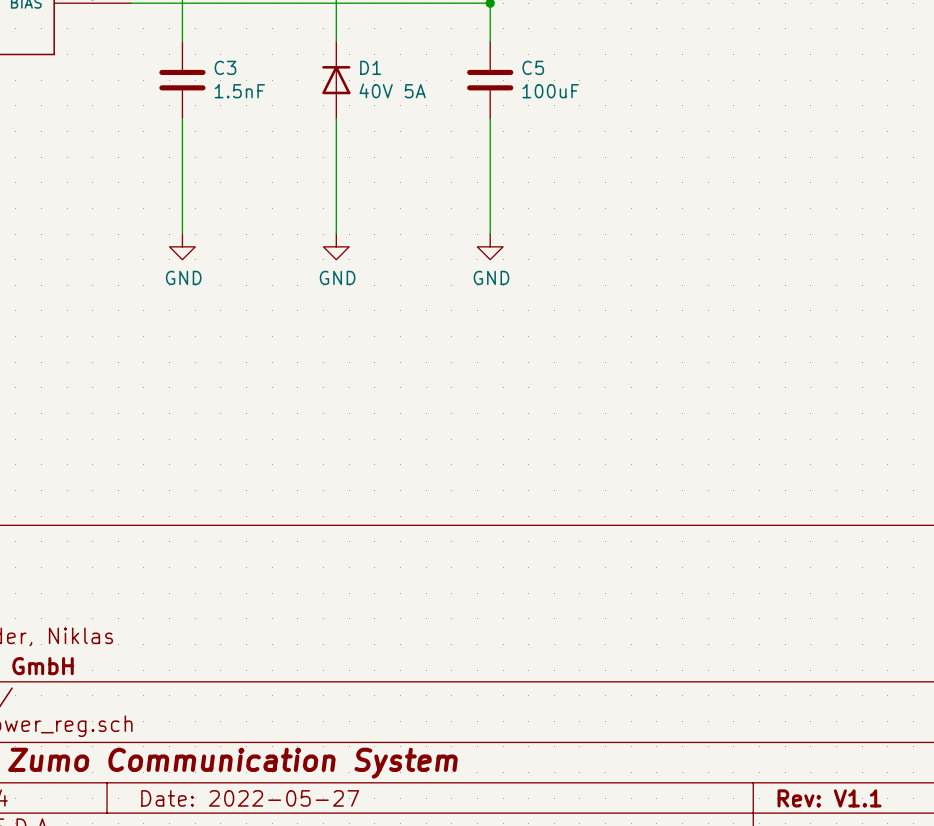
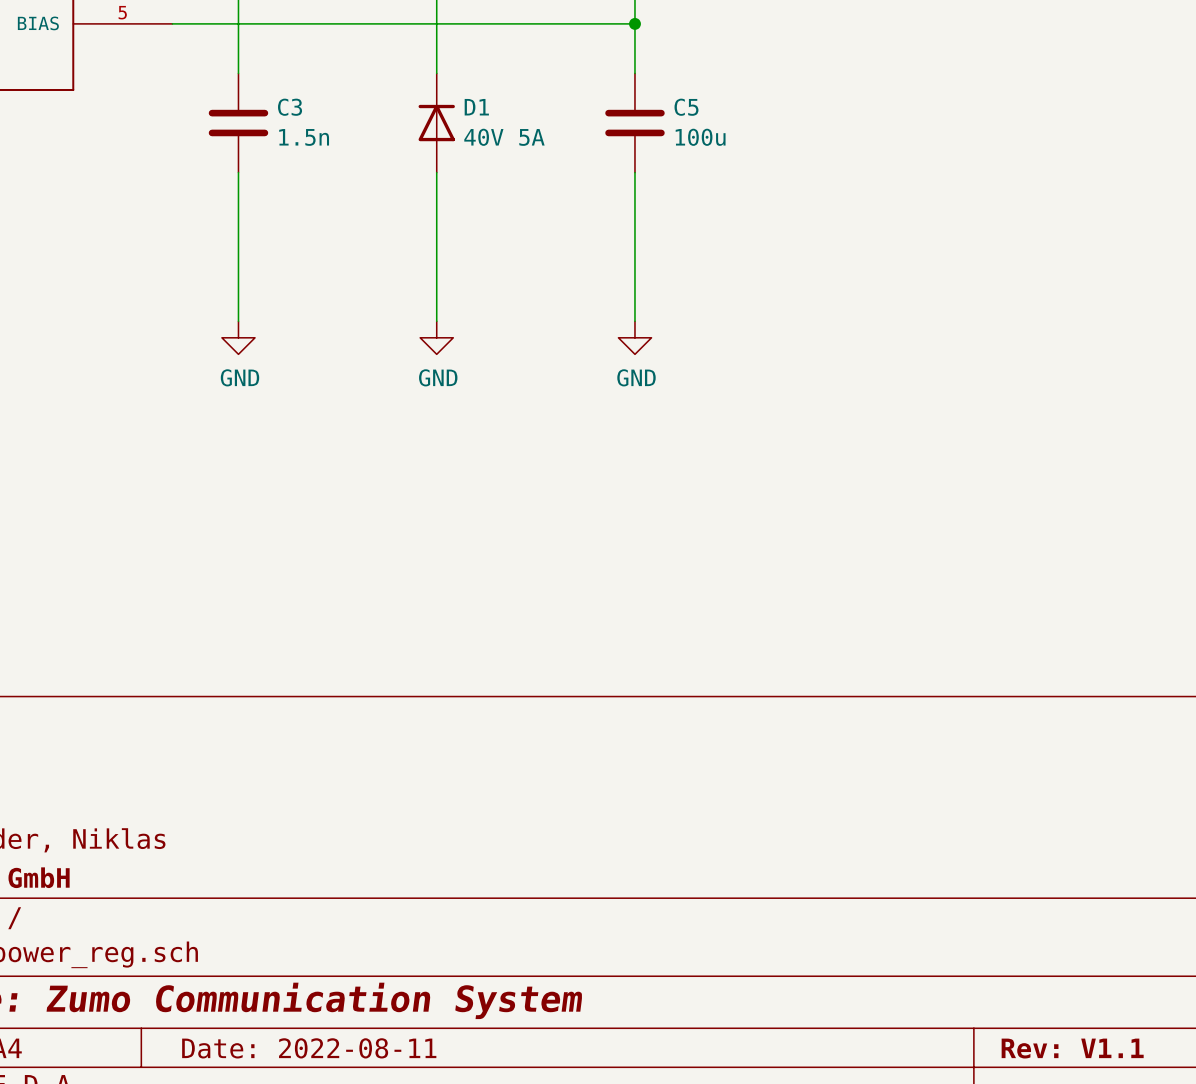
C3 value: 1.5nF (239, 91) -> 1.5n (304, 137)
C5 value: 100uF (550, 91) -> 100u (700, 137)
title block: Date: 2022-05-27 (250, 798) -> Date: 2022-08-11 (309, 1048)

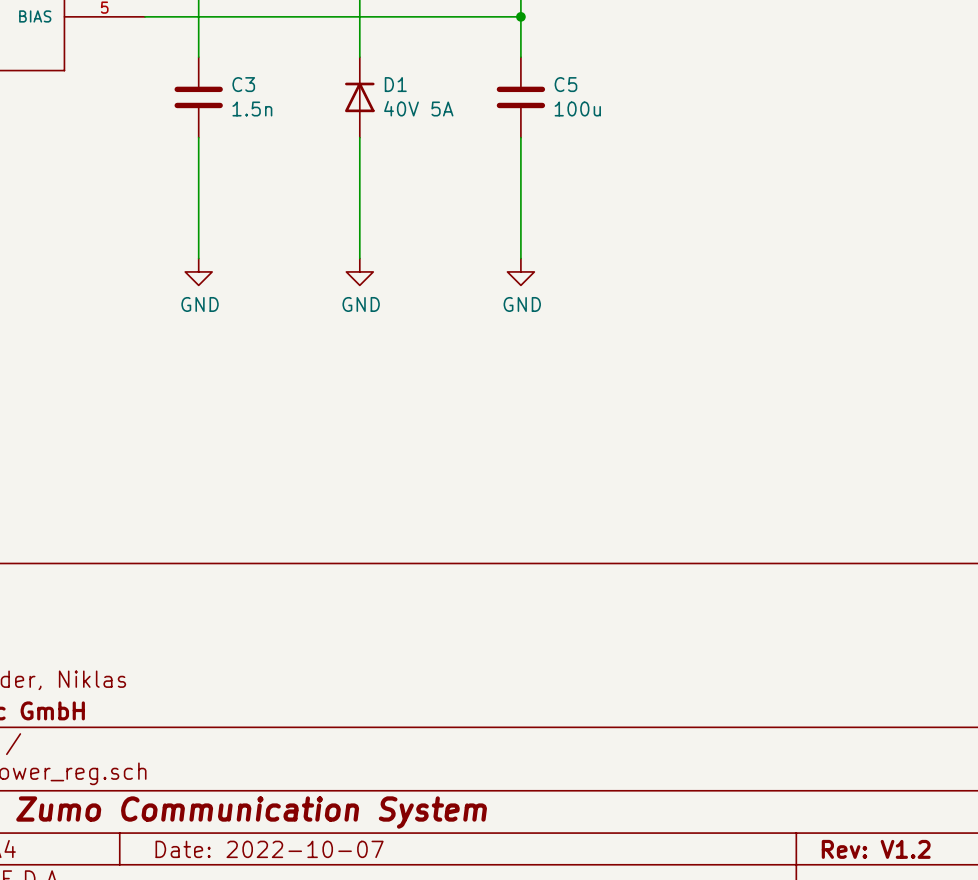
title block: Date: 2022-08-11 (309, 1048) -> Date: 2022-10-07 (269, 849)
title block: Rev: V1.1 (1072, 1048) -> Rev: V1.2 (876, 849)

